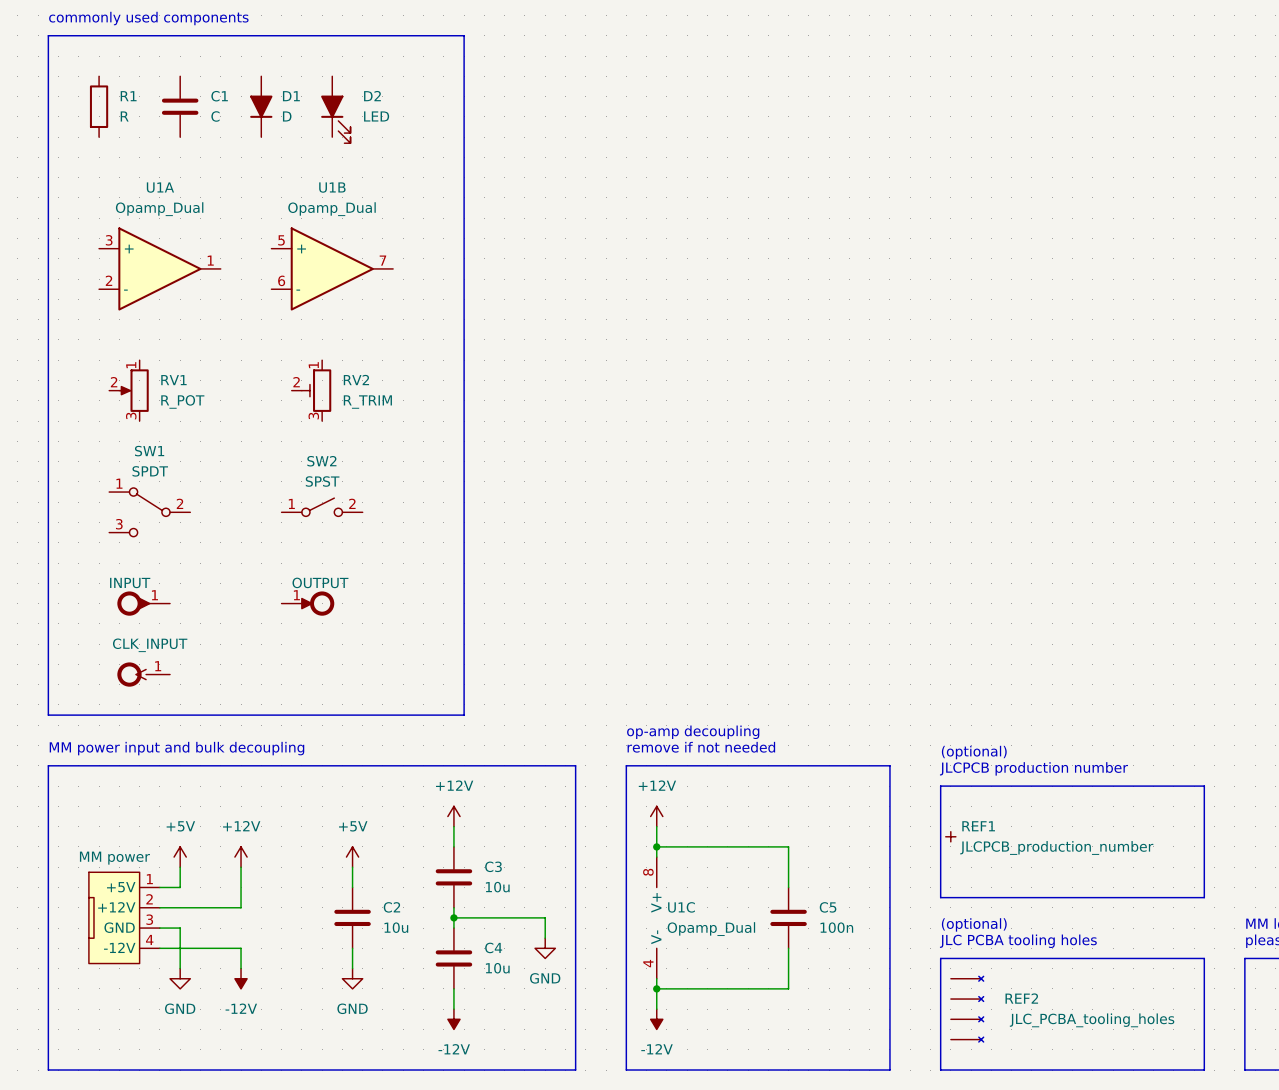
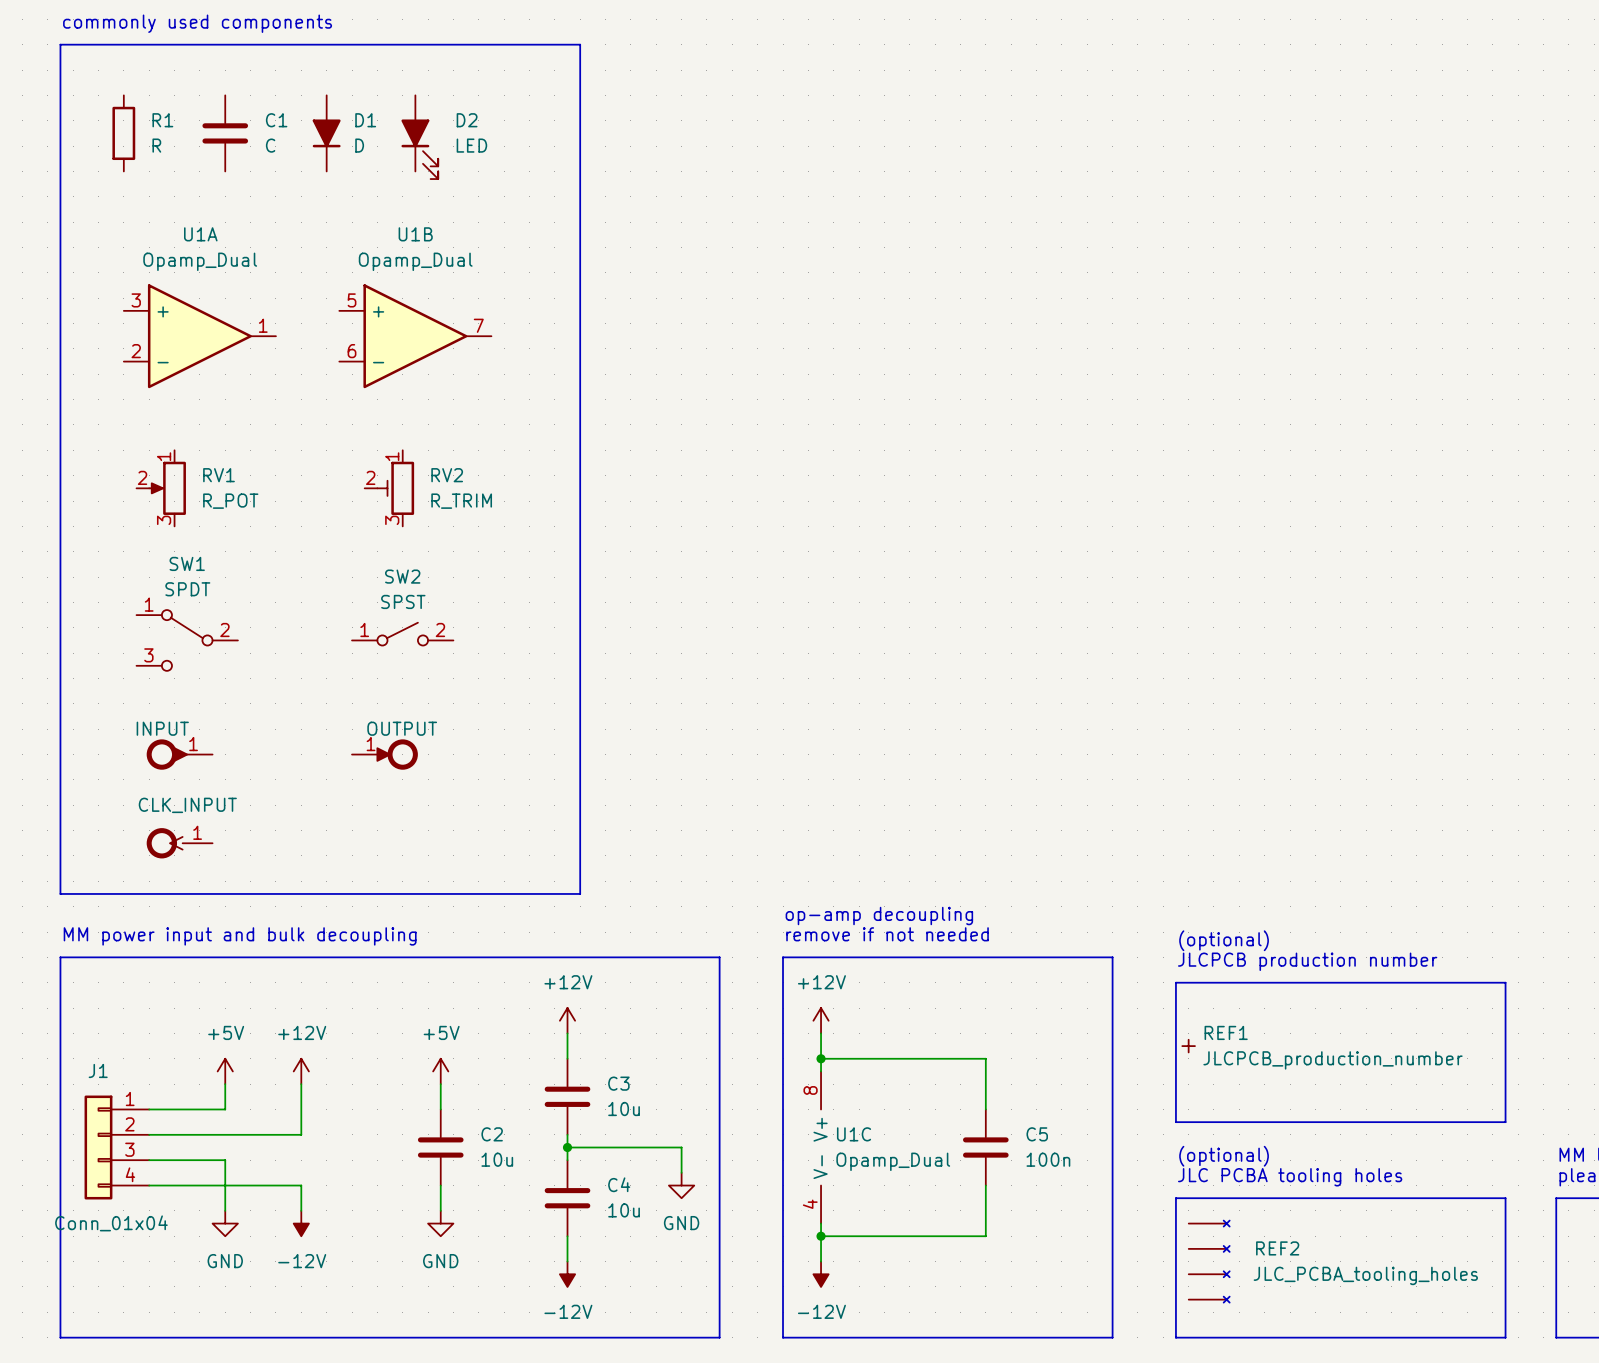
J1: none -> Conn_01x04 (116, 1147)
part: MM power (124, 917) -> none

